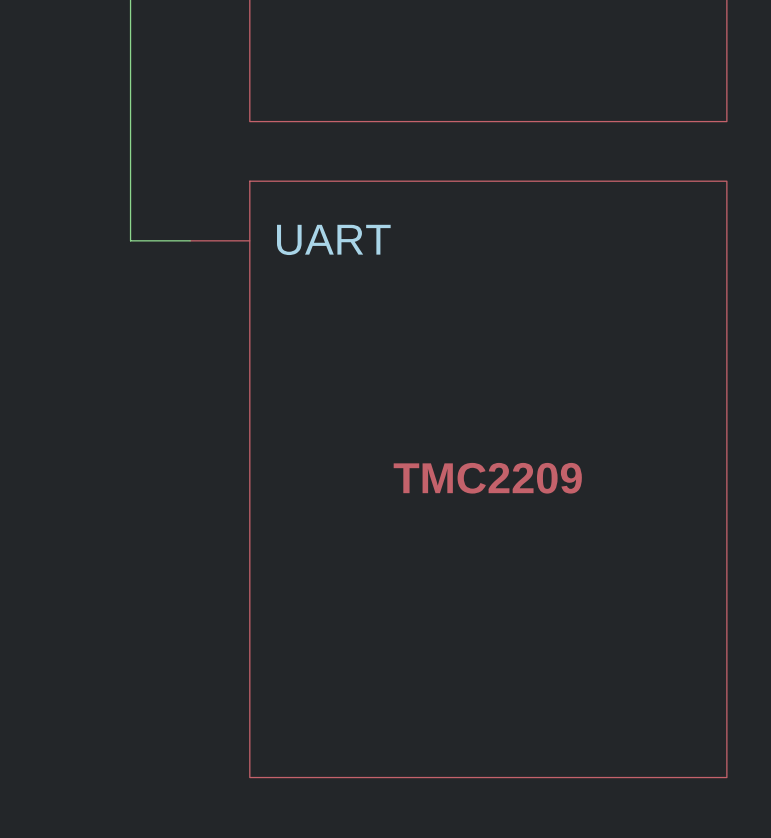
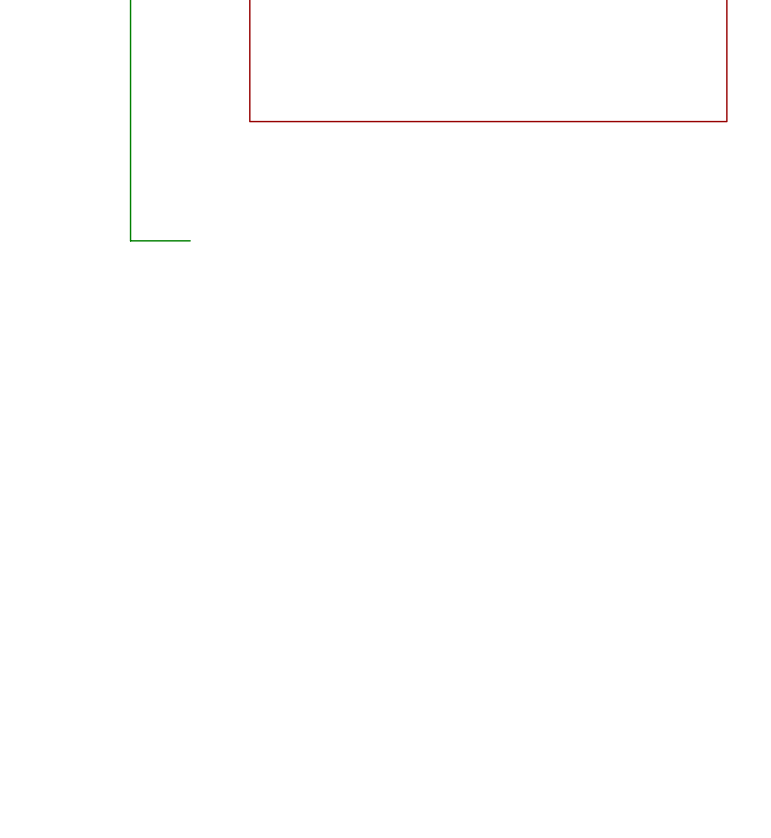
part: (458, 479) -> none

